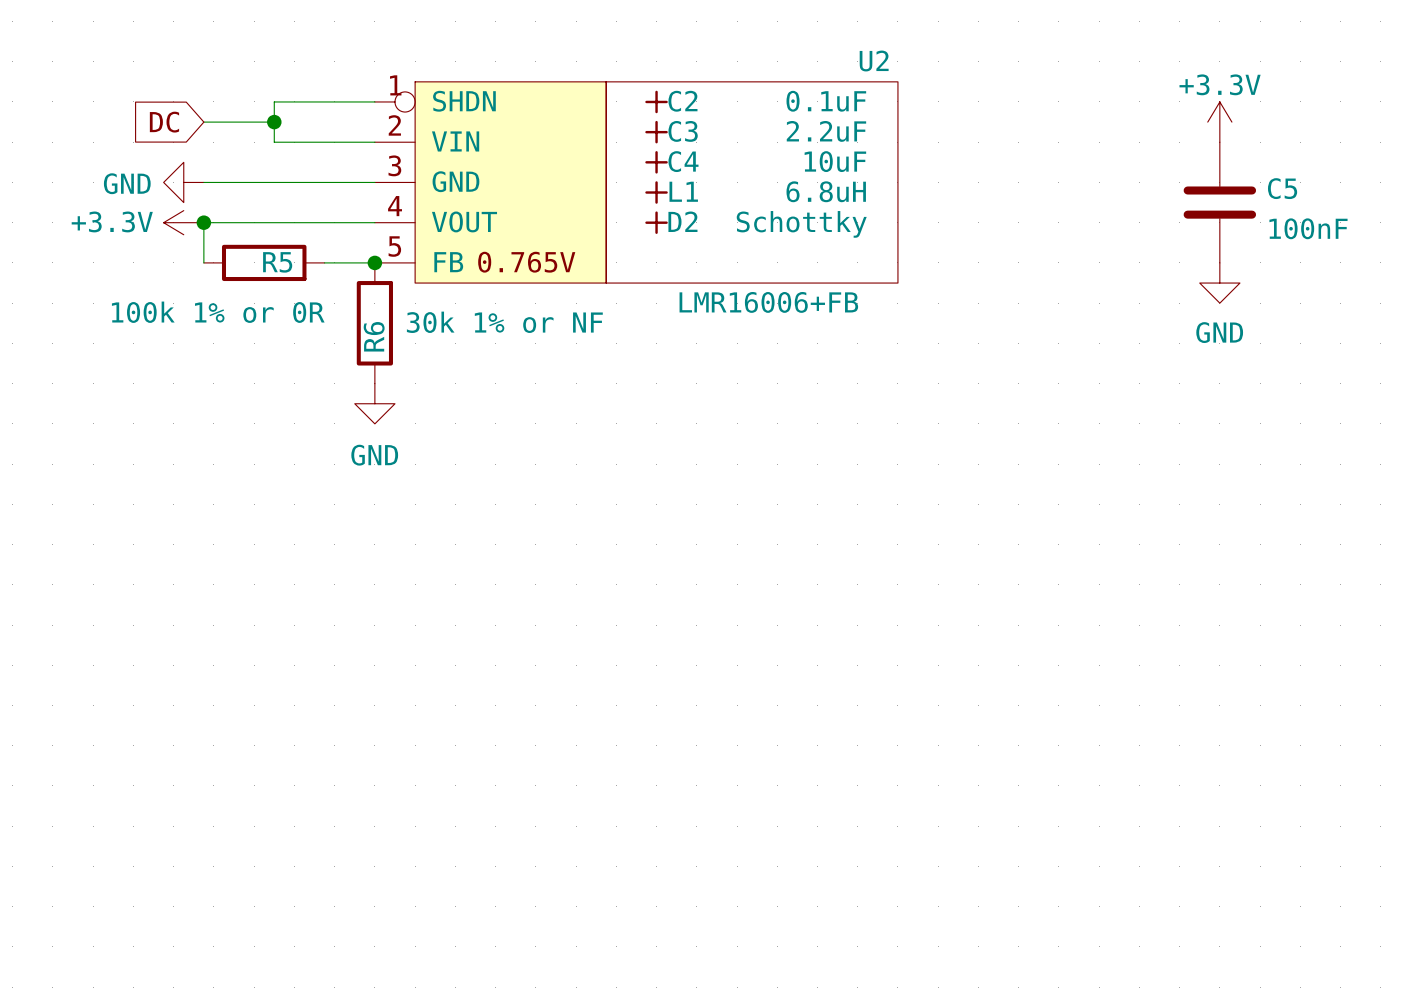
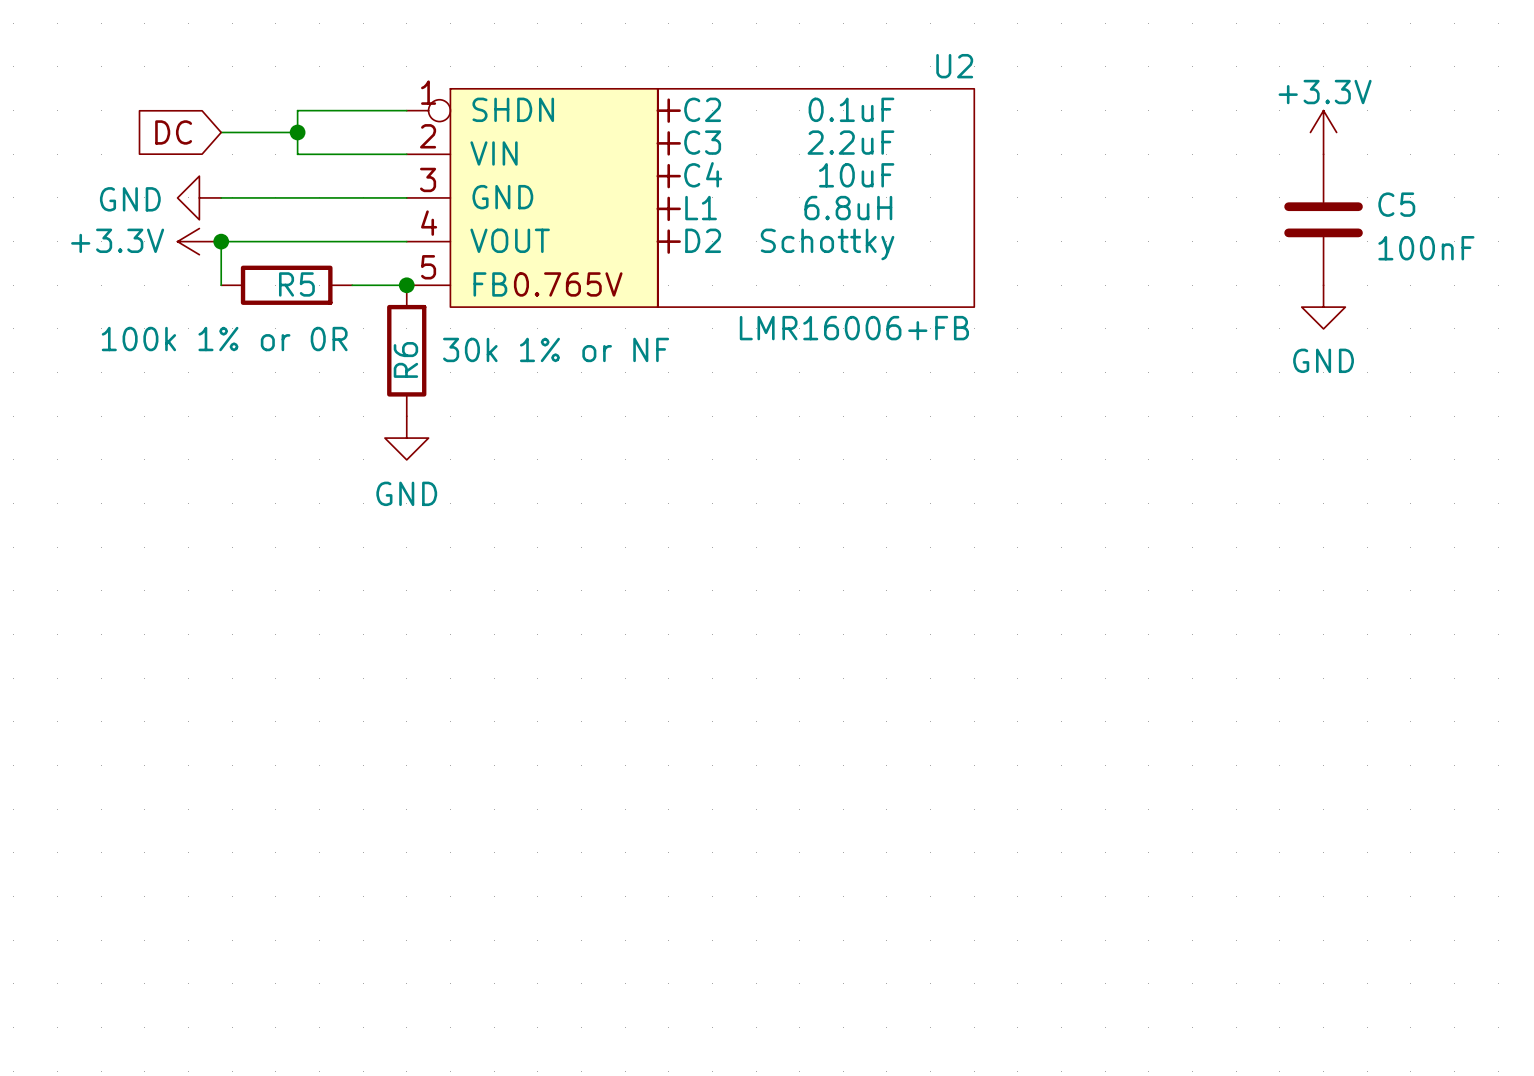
C2 position: (656, 101) -> (668, 110)
C3 position: (656, 132) -> (668, 143)
C4 position: (656, 162) -> (668, 176)
L1 position: (656, 192) -> (668, 208)
D2 position: (656, 222) -> (668, 241)

